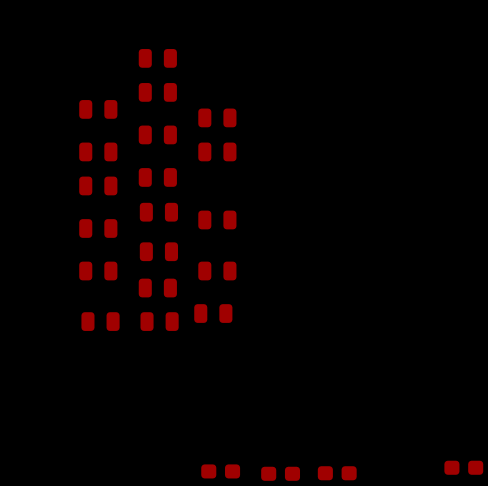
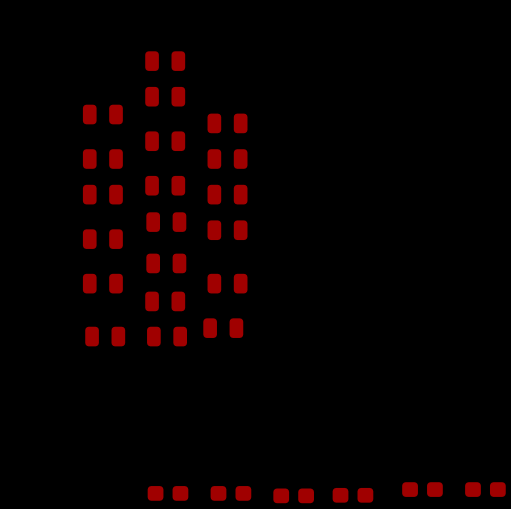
part: none -> (227, 194)
part: none -> (422, 489)
part: none -> (168, 493)

